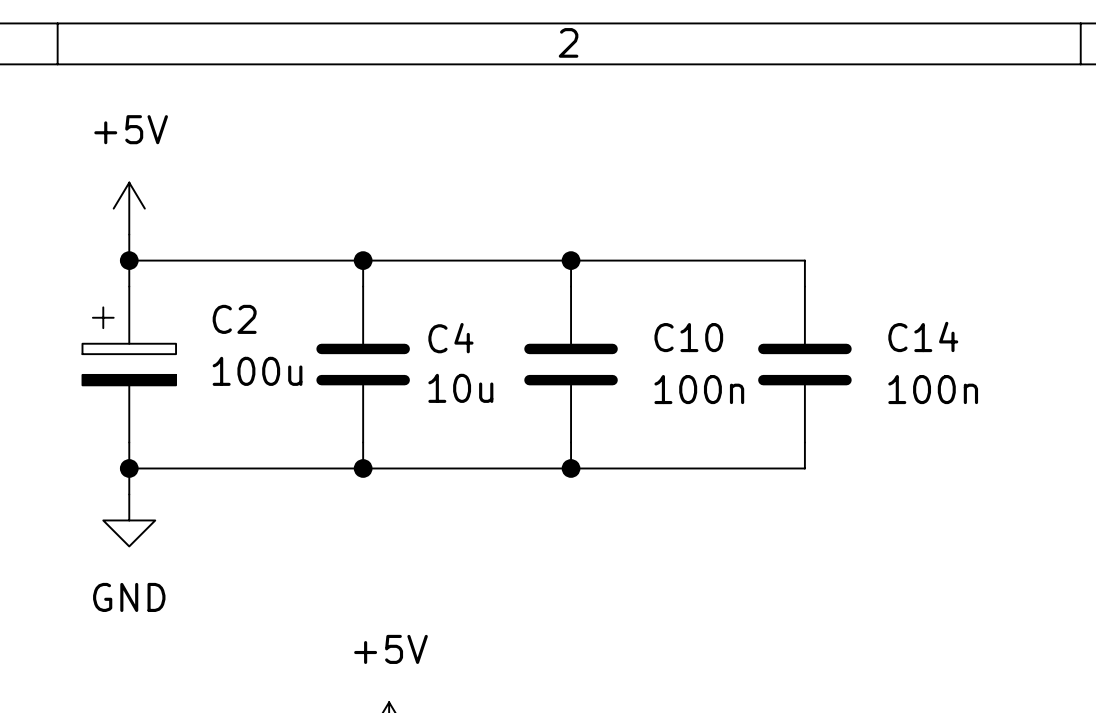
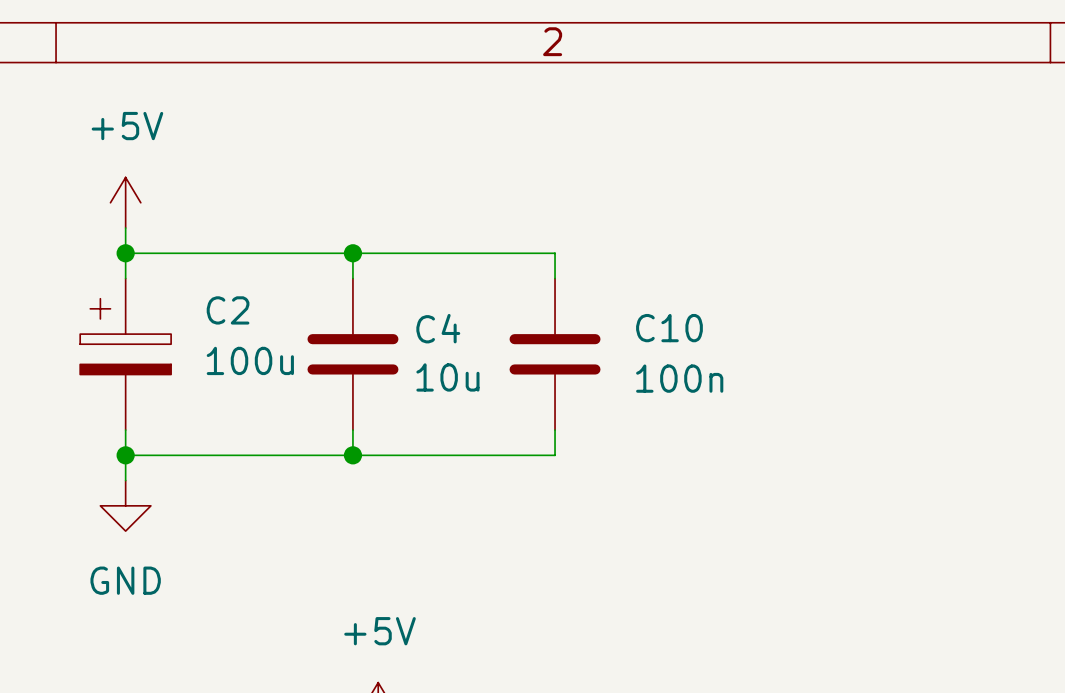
wire: (571, 260) (804, 260) (804, 286) -> none
junction: (571, 260) -> none
C14: 100n (804, 364) -> none
wire: (804, 442) (804, 468) (571, 468) -> none
junction: (571, 468) -> none

